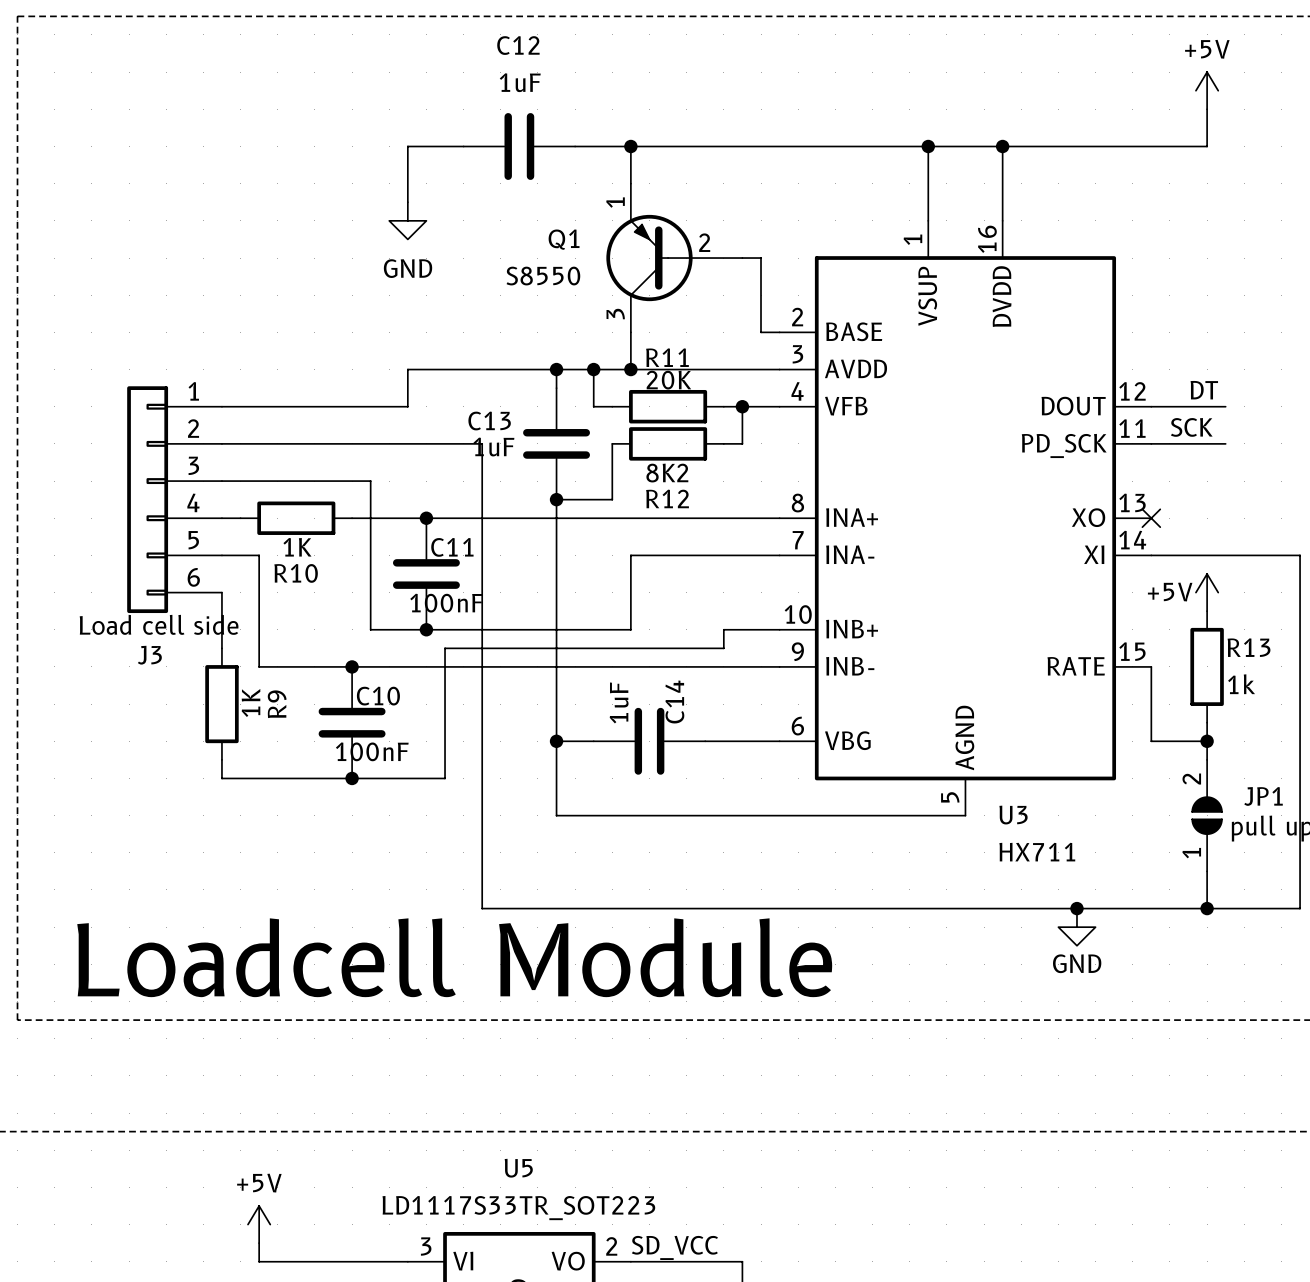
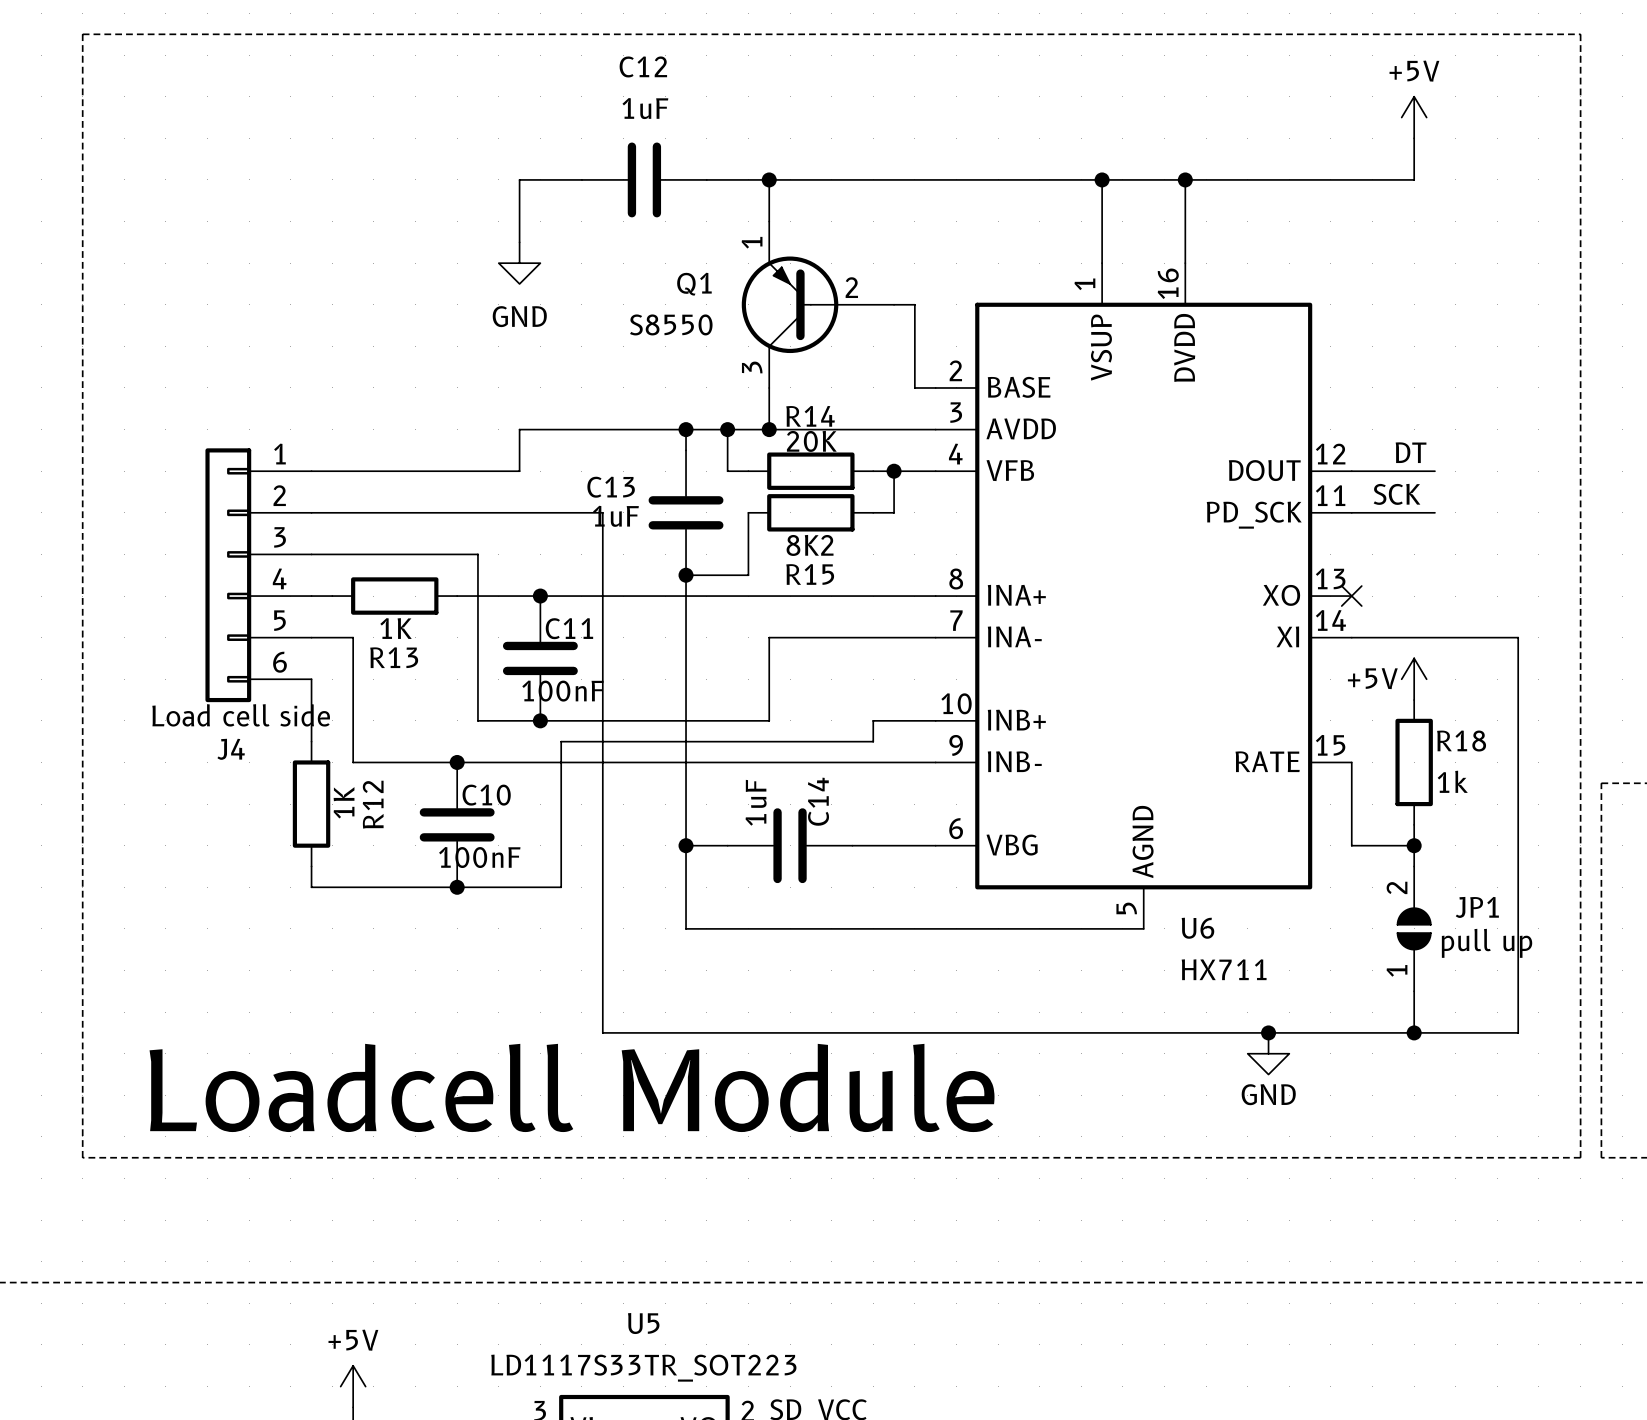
R11 name: R11 (667, 357) -> R14 (810, 416)
R12 name: R12 (667, 498) -> R15 (810, 574)
R10 name: R10 (296, 573) -> R13 (394, 657)
R13 name: R13 (1249, 647) -> R18 (1461, 741)
J3 name: J3 (149, 655) -> J4 (231, 749)
R9 name: R9 (277, 704) -> R12 (373, 804)
U3 name: U3 (1013, 815) -> U6 (1197, 928)

